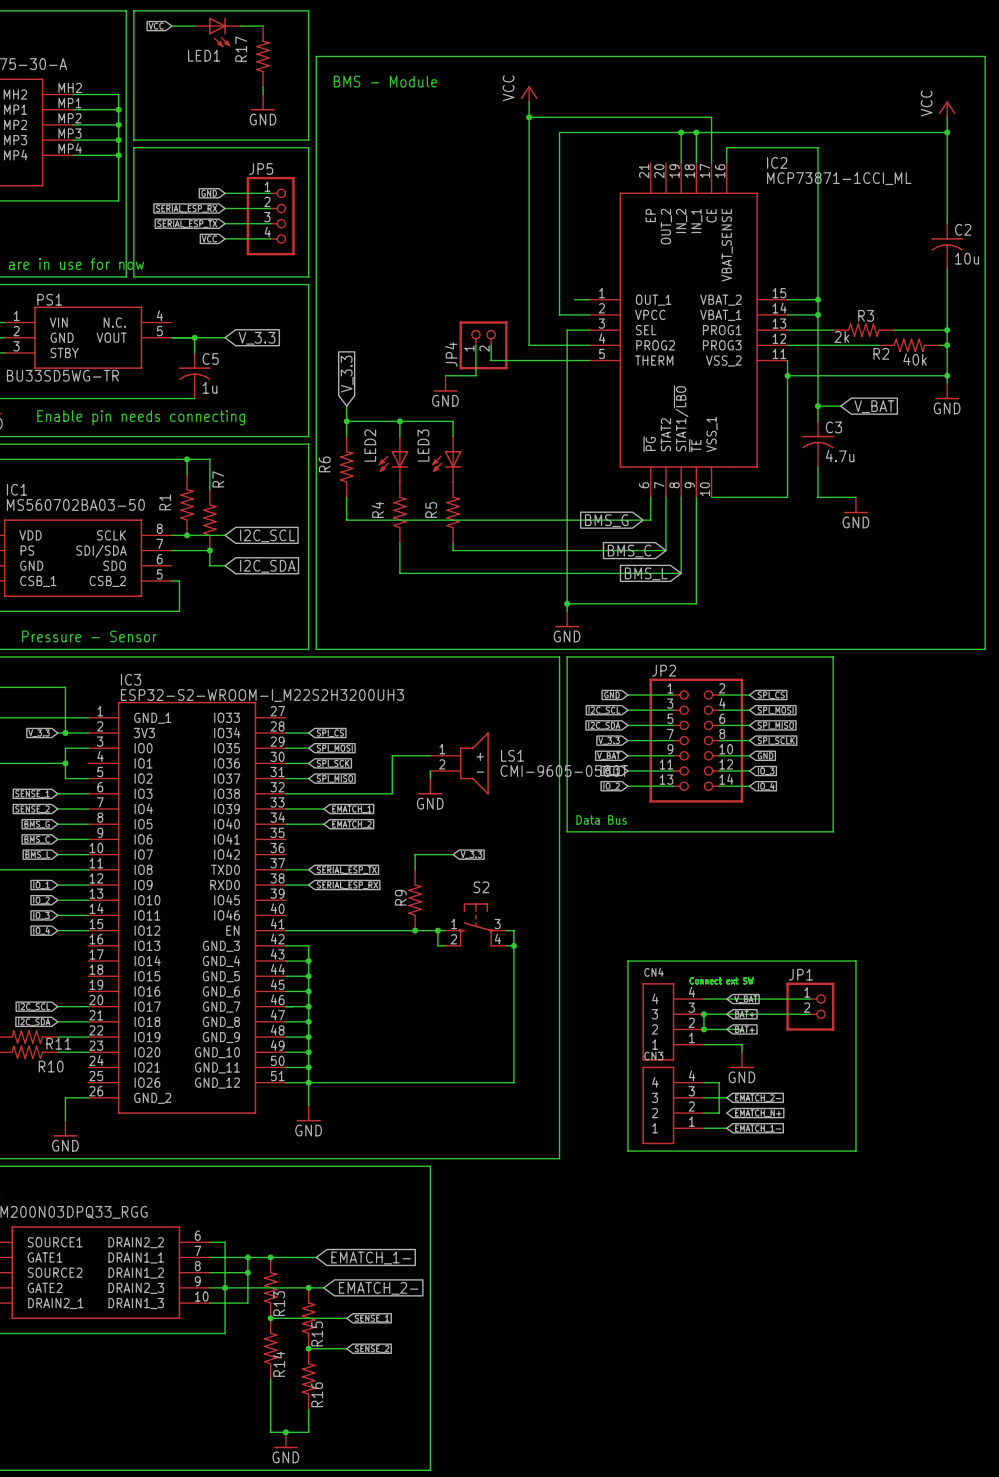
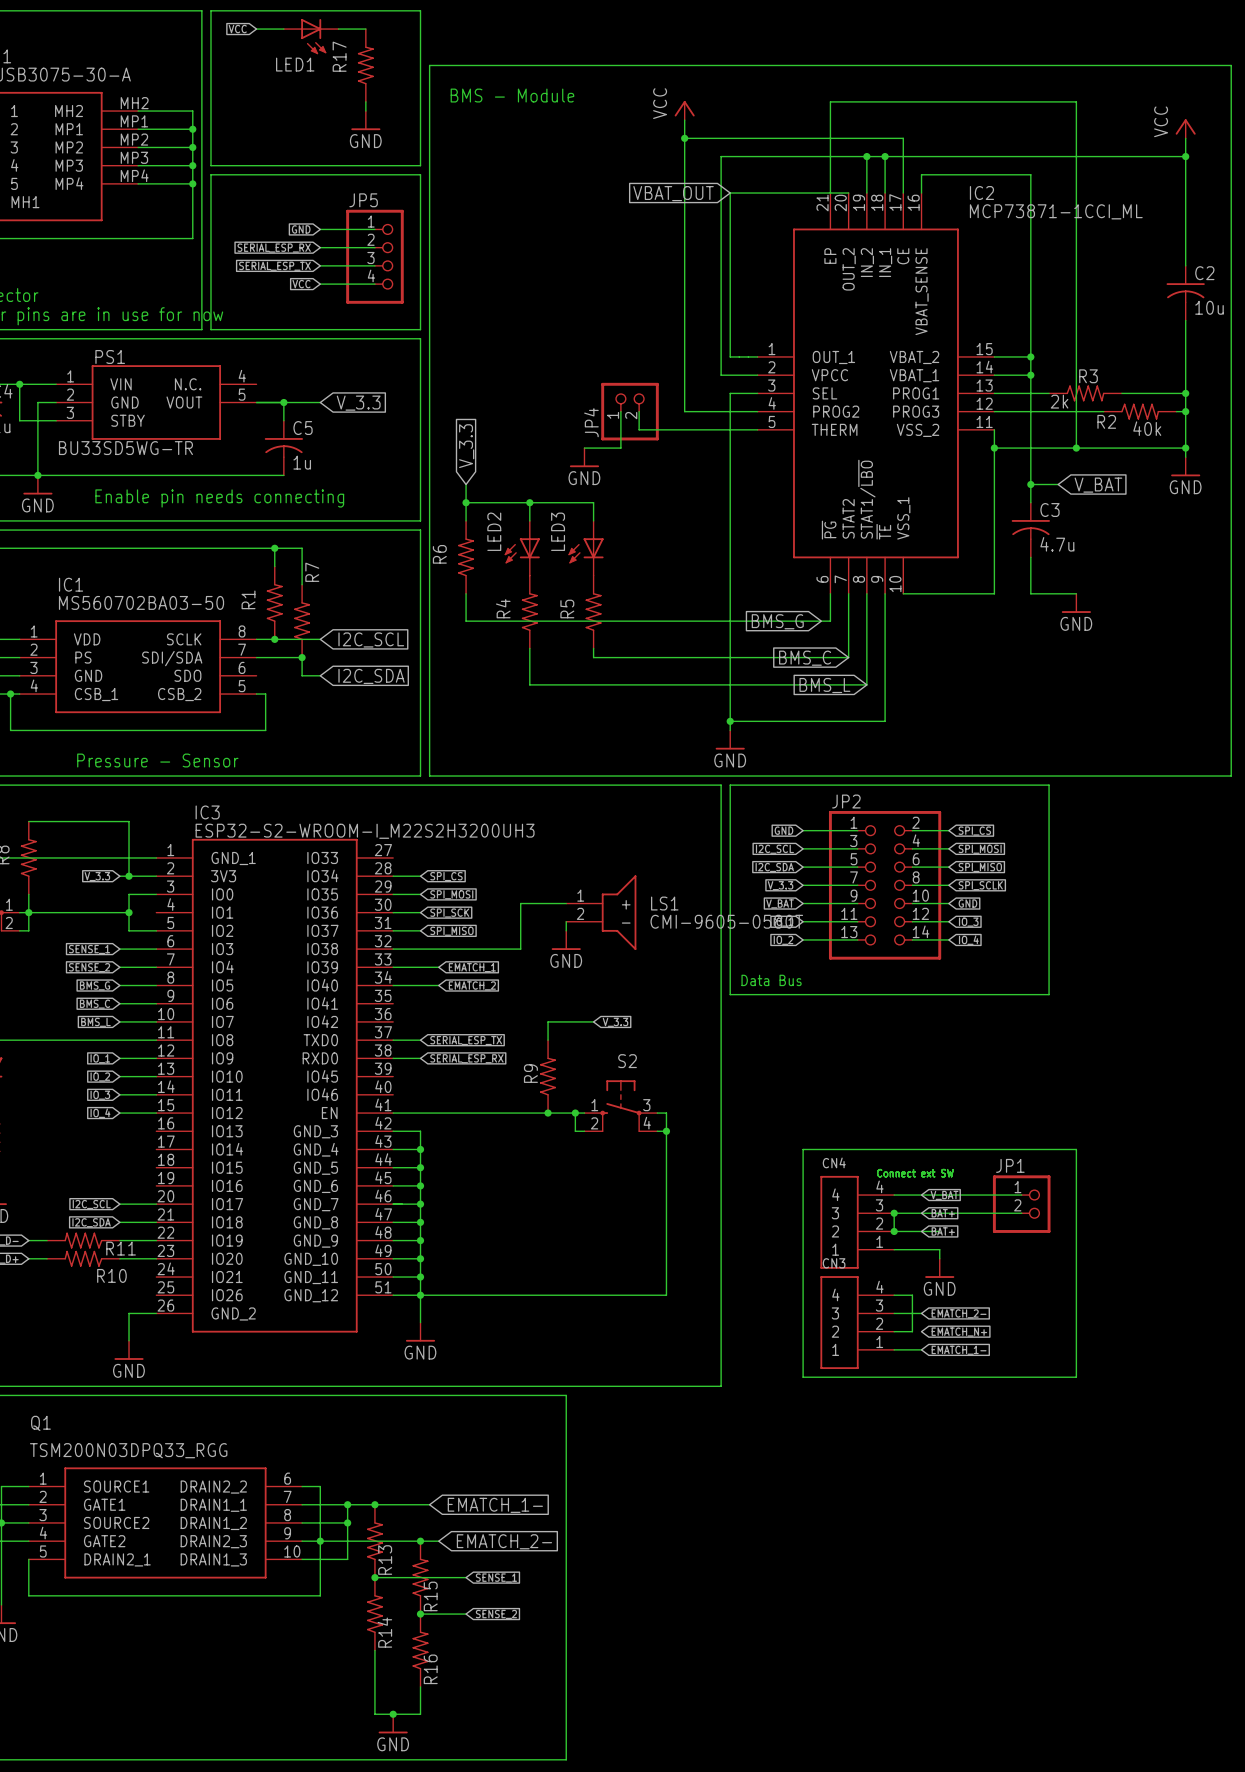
wire: none -> (830, 193) (830, 101) (1076, 101) (1076, 448)
wire: none -> (848, 193) (730, 193) (730, 356) (739, 356)
global label: none -> VBAT_OUT (673, 193)
junction: none -> (1076, 448)

